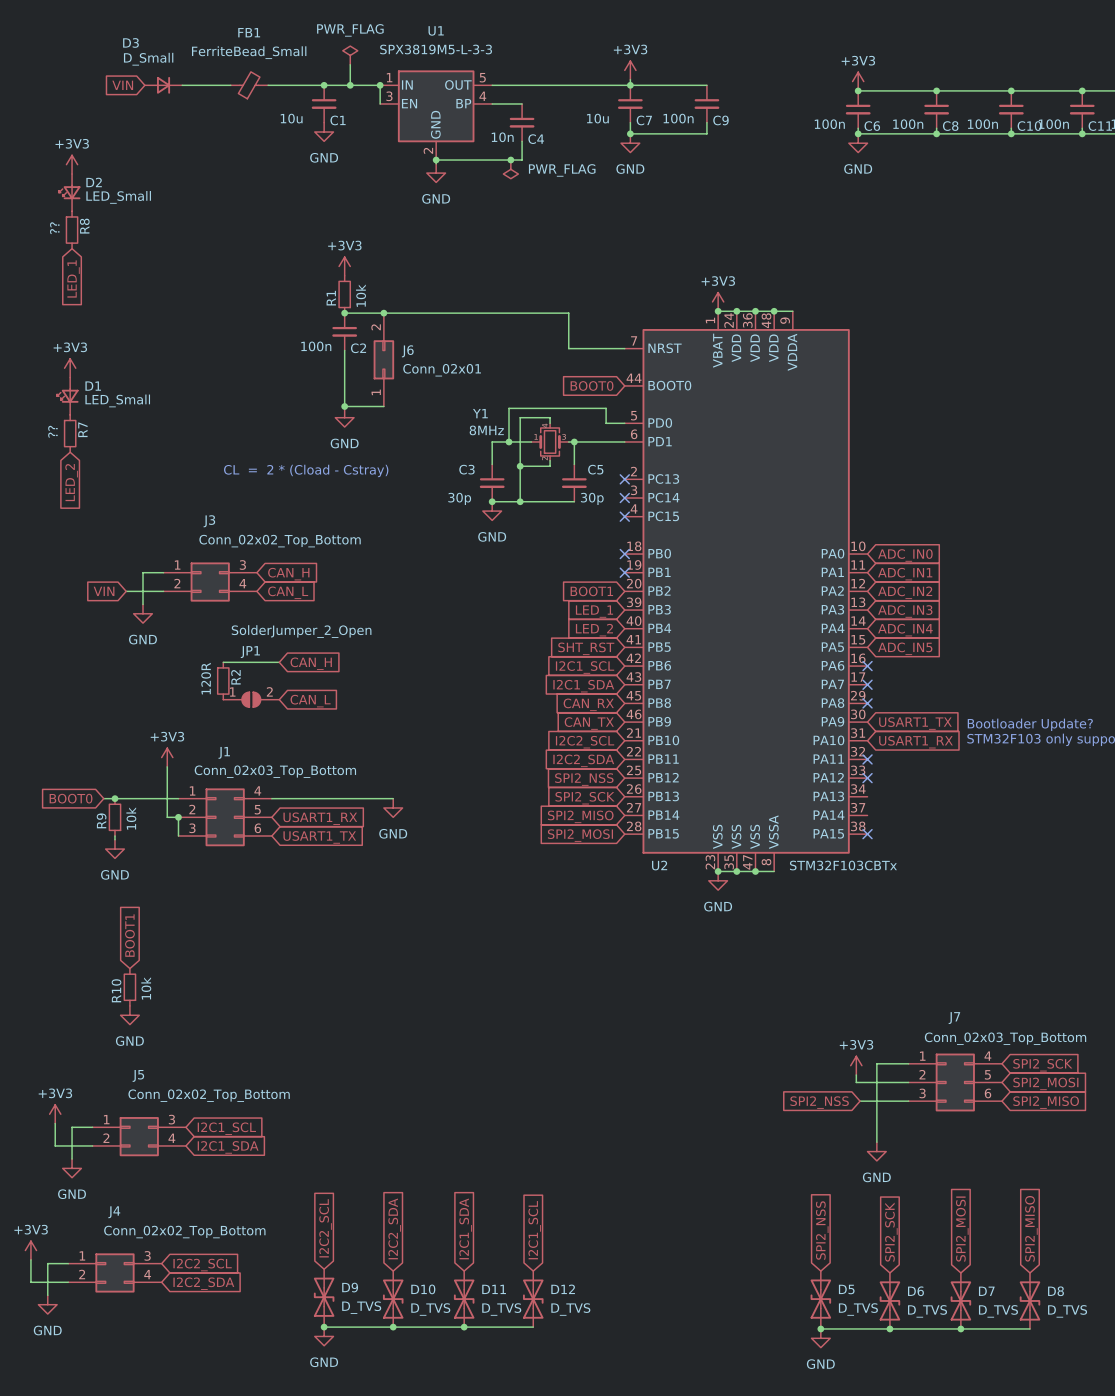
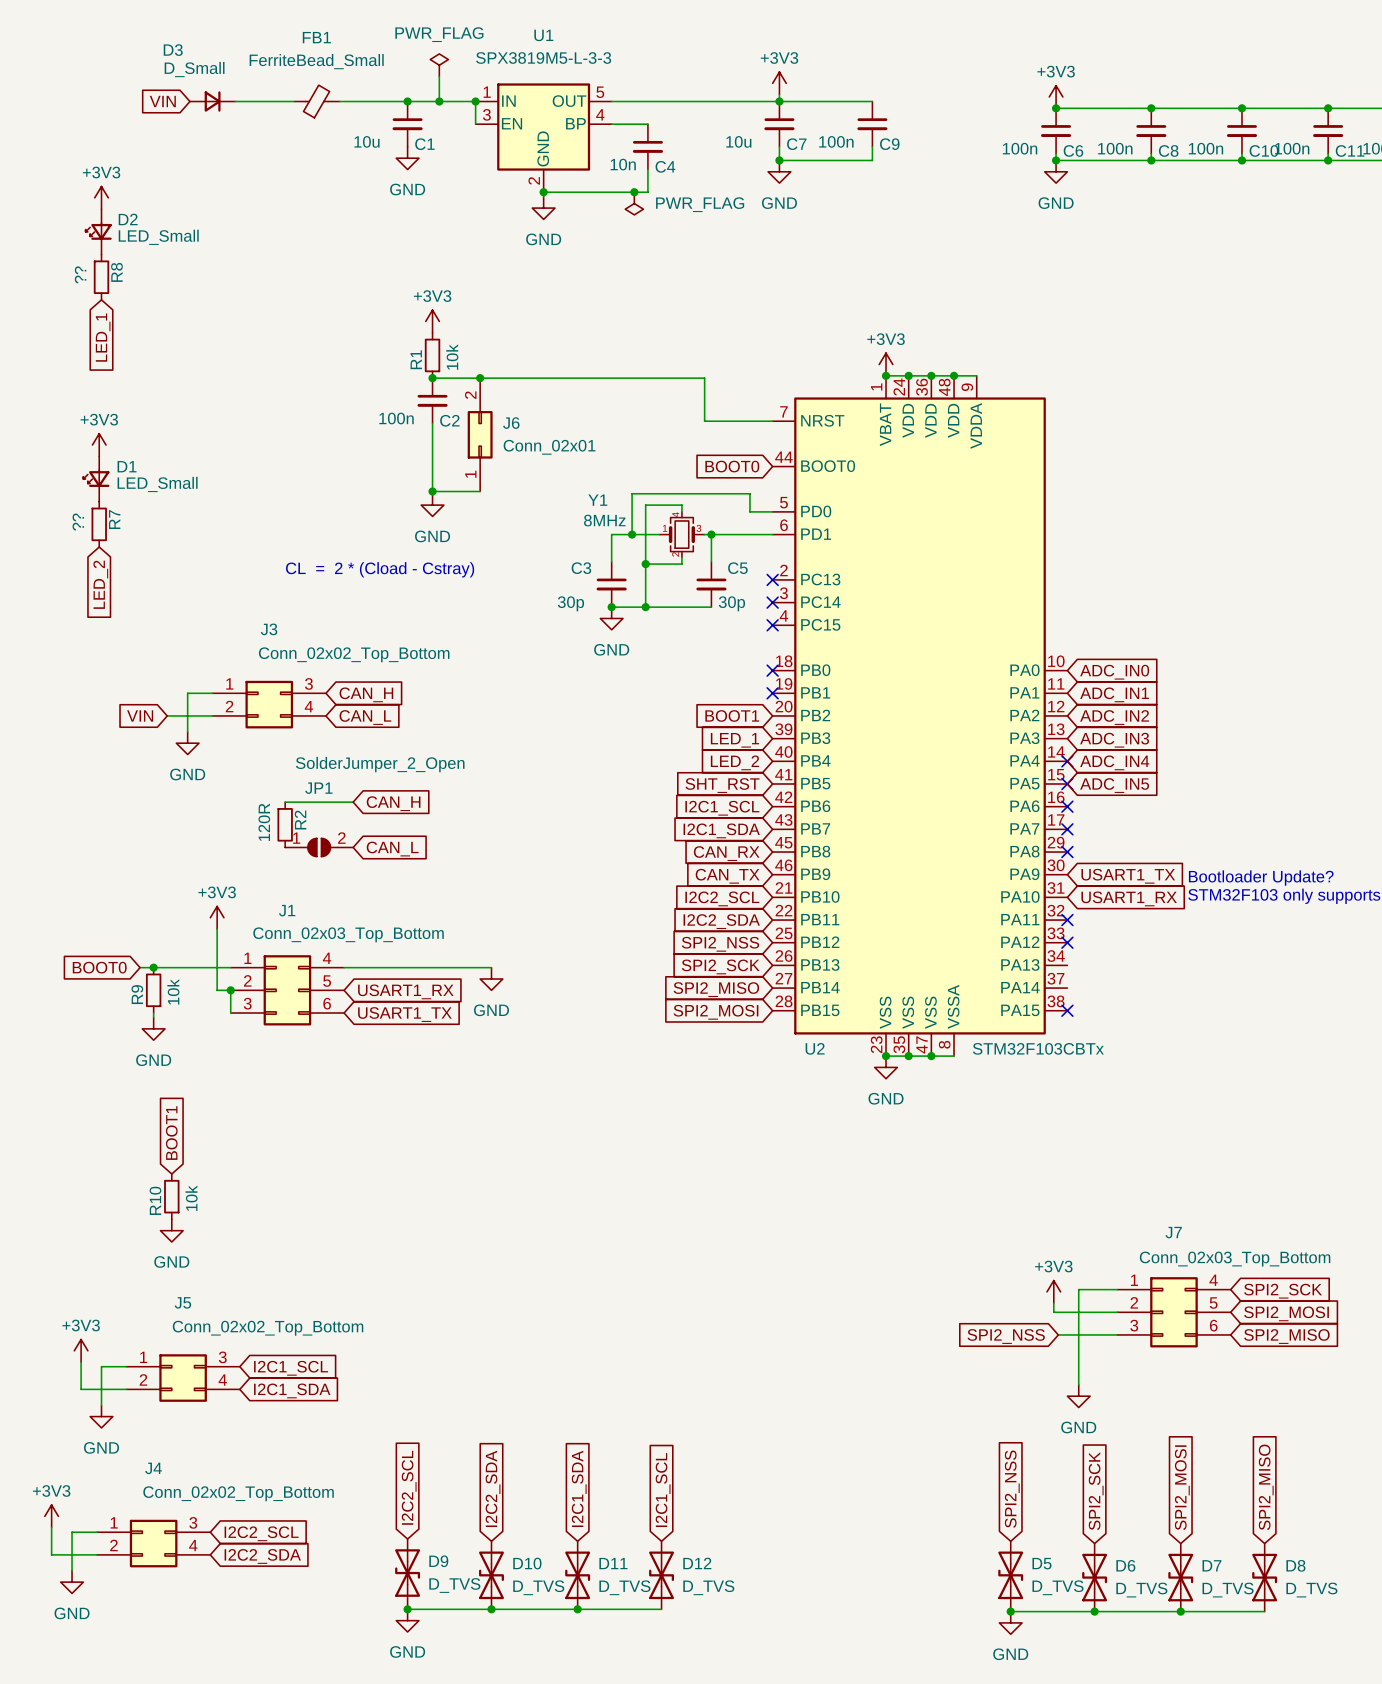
no-connect mark: none -> (1067, 761)
no-connect mark: none -> (1067, 784)

